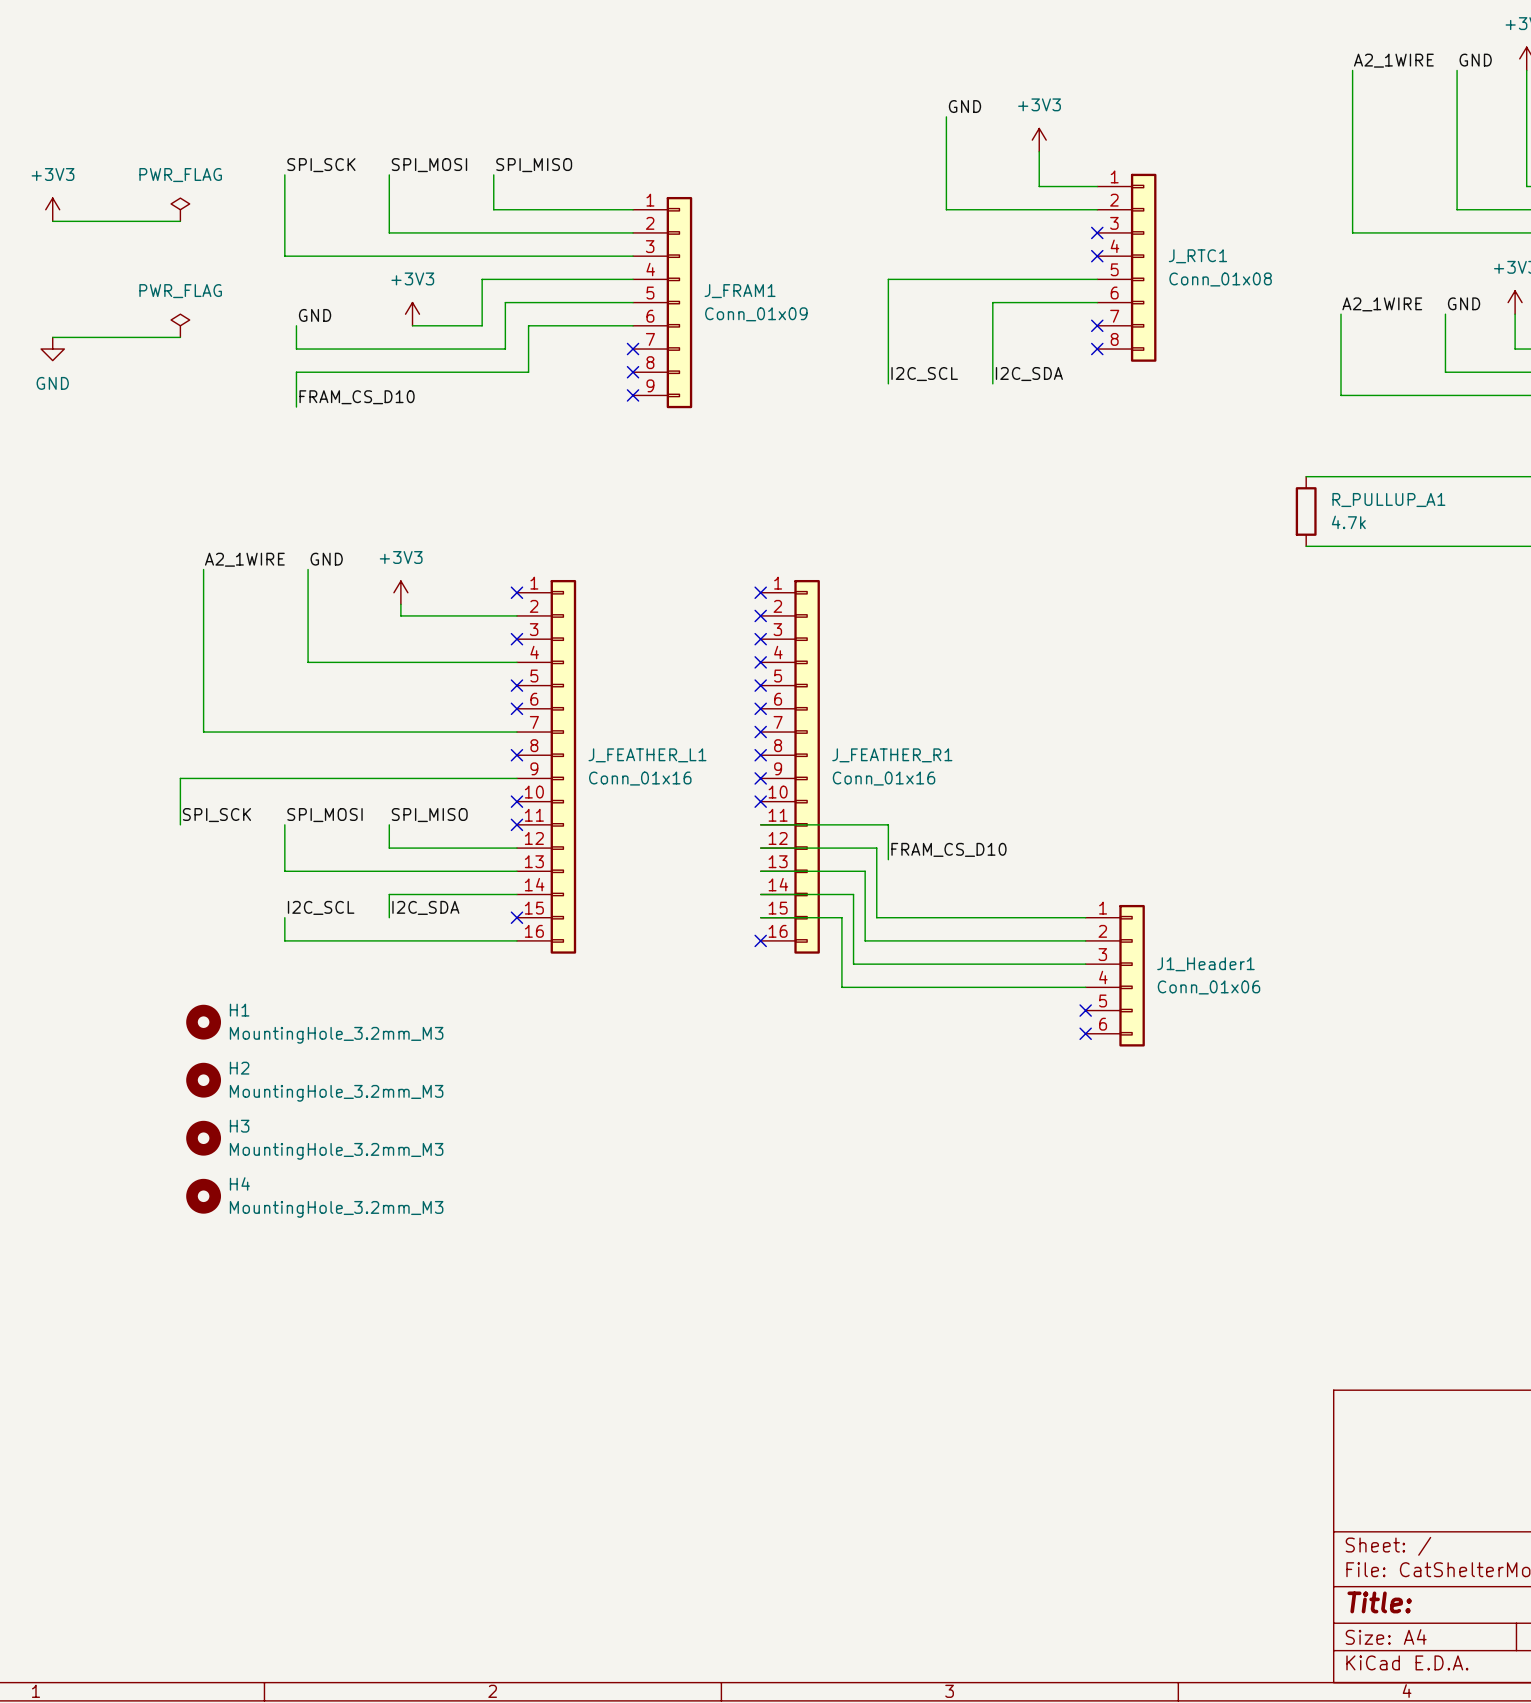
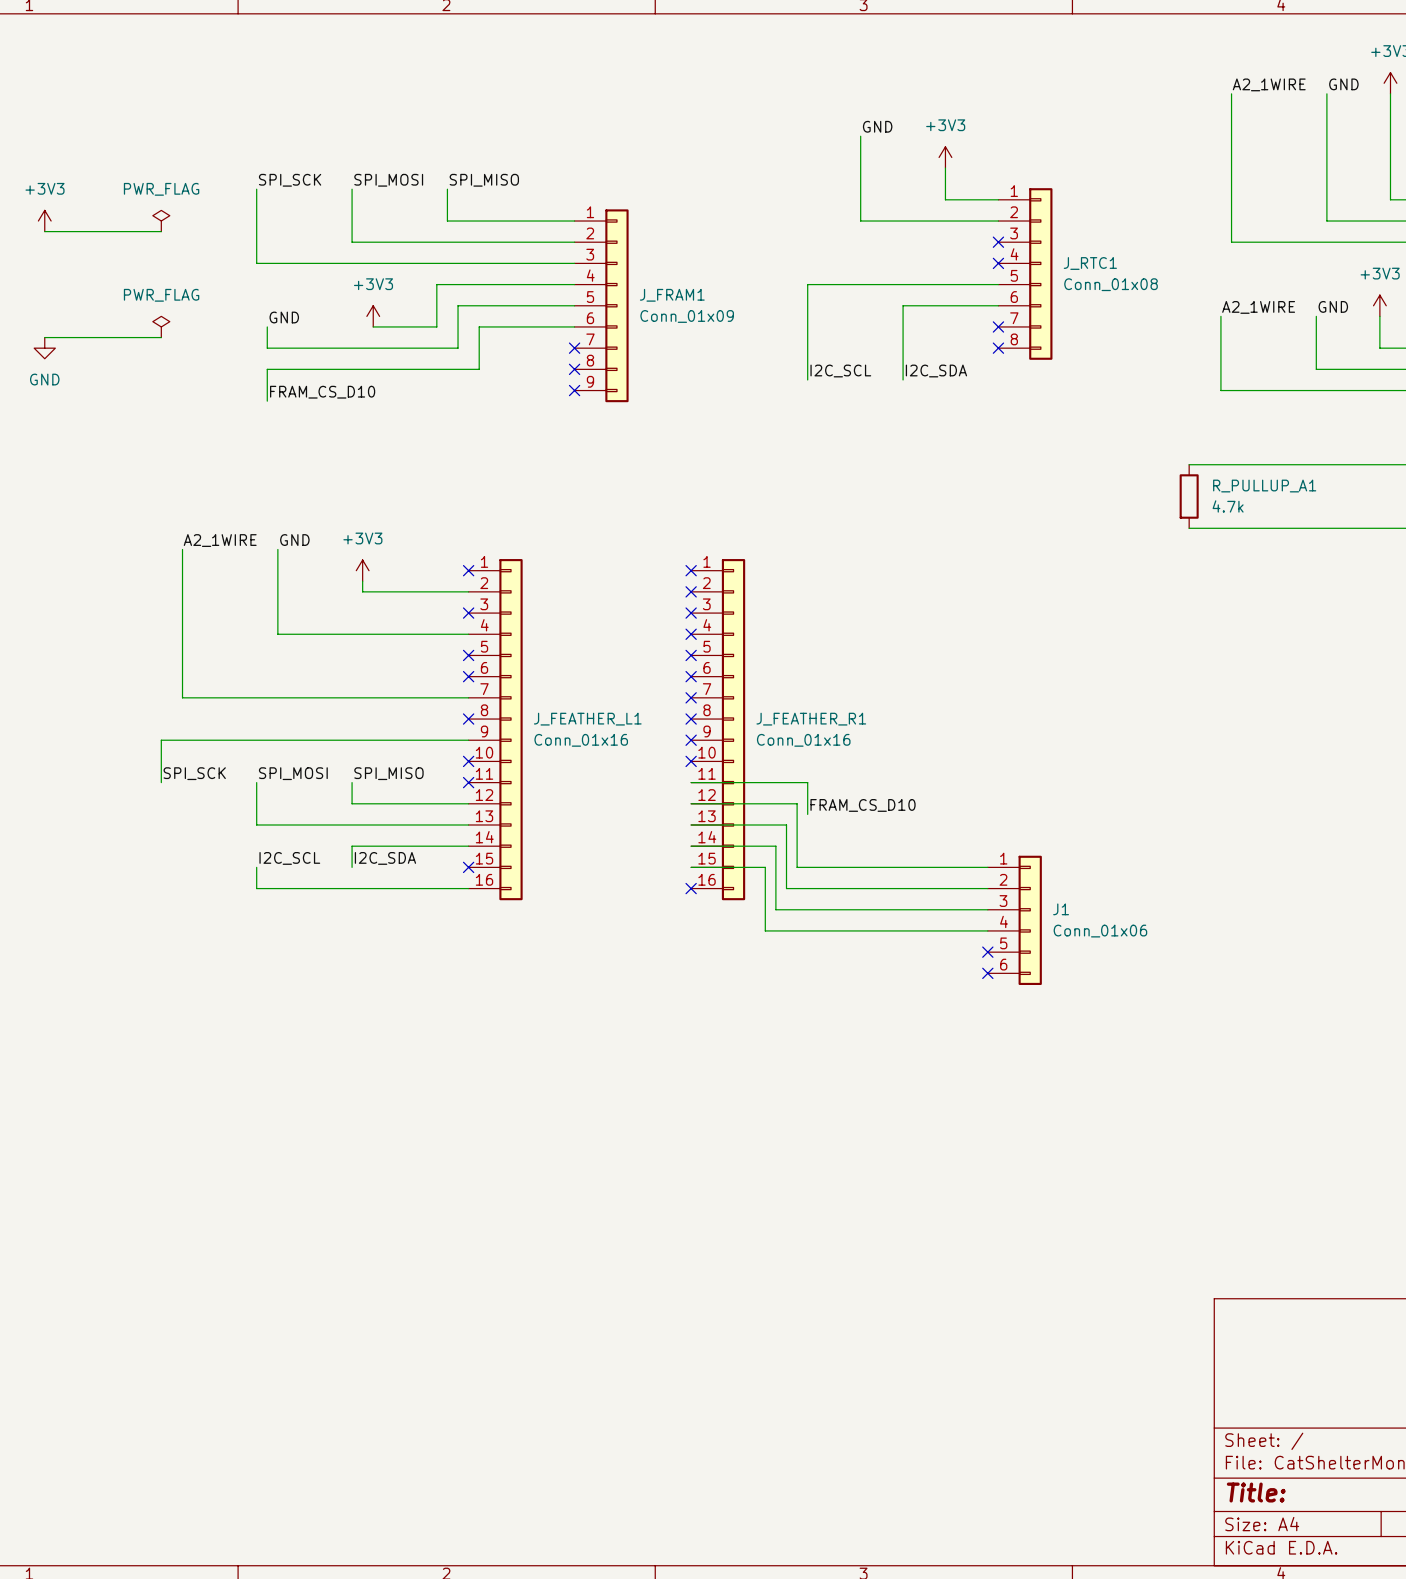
J1_Header1 name: J1_Header1 (1205, 964) -> J1 (1061, 909)
H1: MountingHole_3.2mm_M3 (203, 1022) -> none
H2: MountingHole_3.2mm_M3 (203, 1080) -> none
H3: MountingHole_3.2mm_M3 (203, 1138) -> none
H4: MountingHole_3.2mm_M3 (203, 1196) -> none

